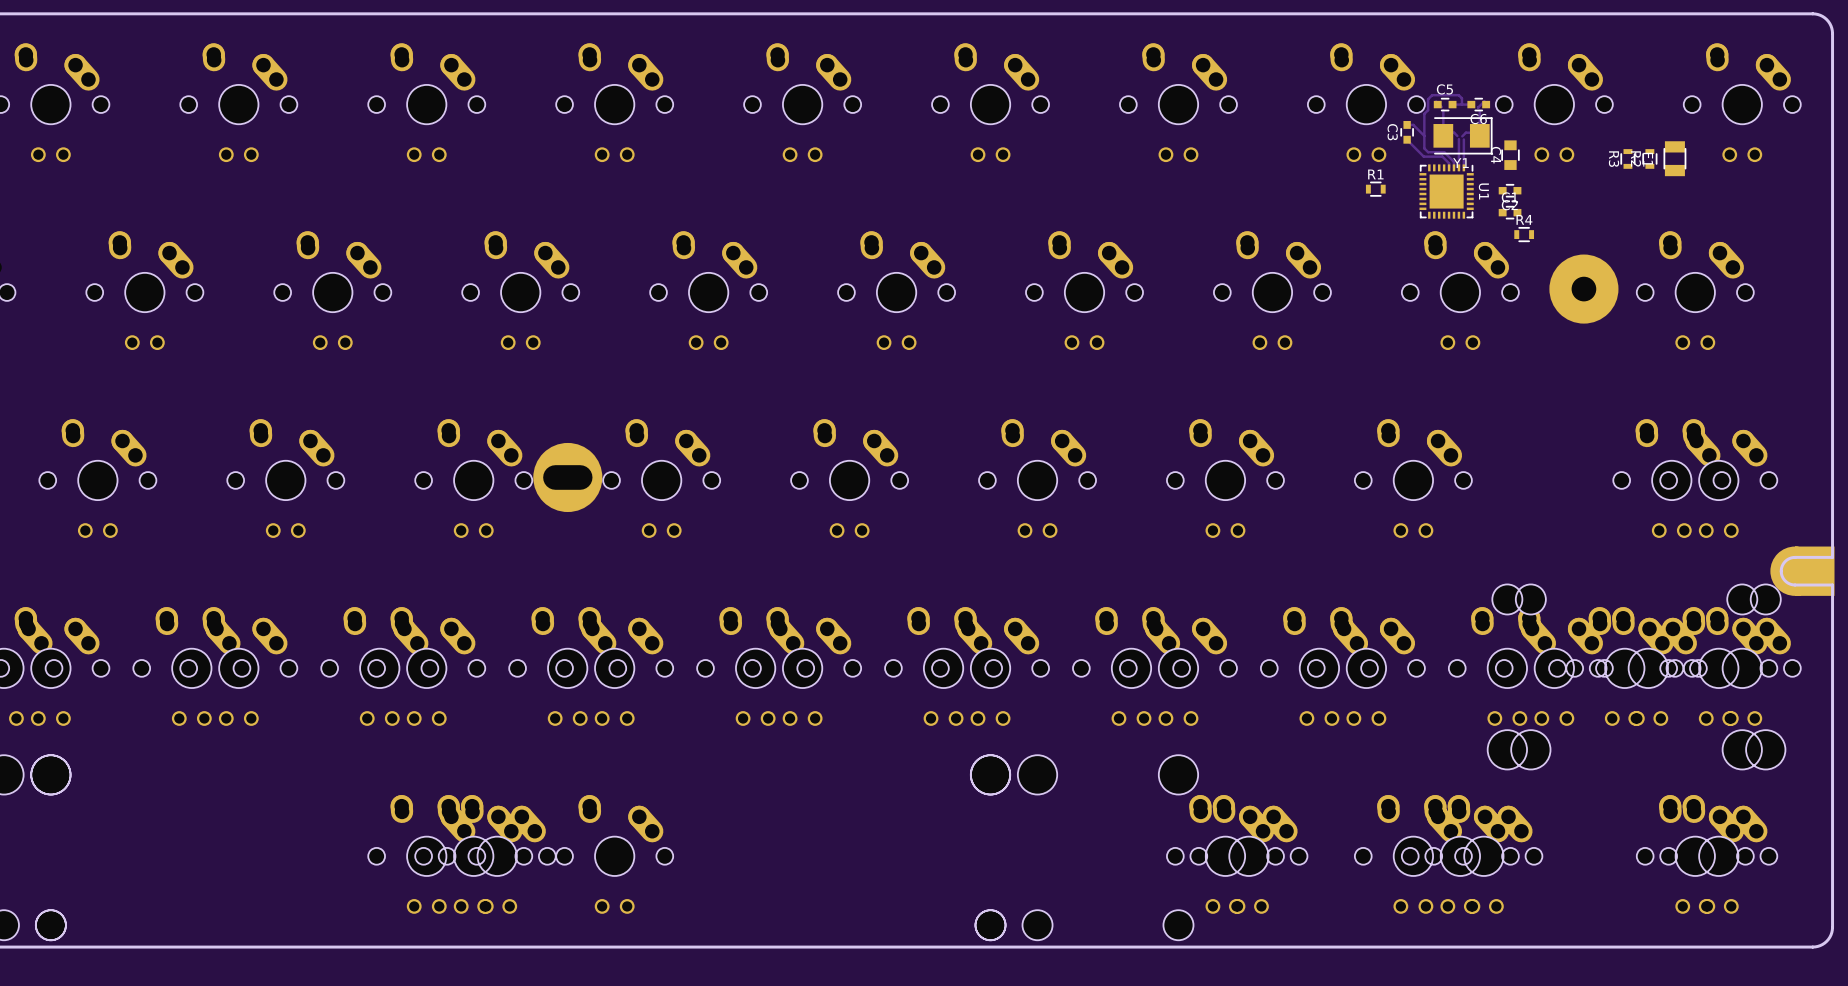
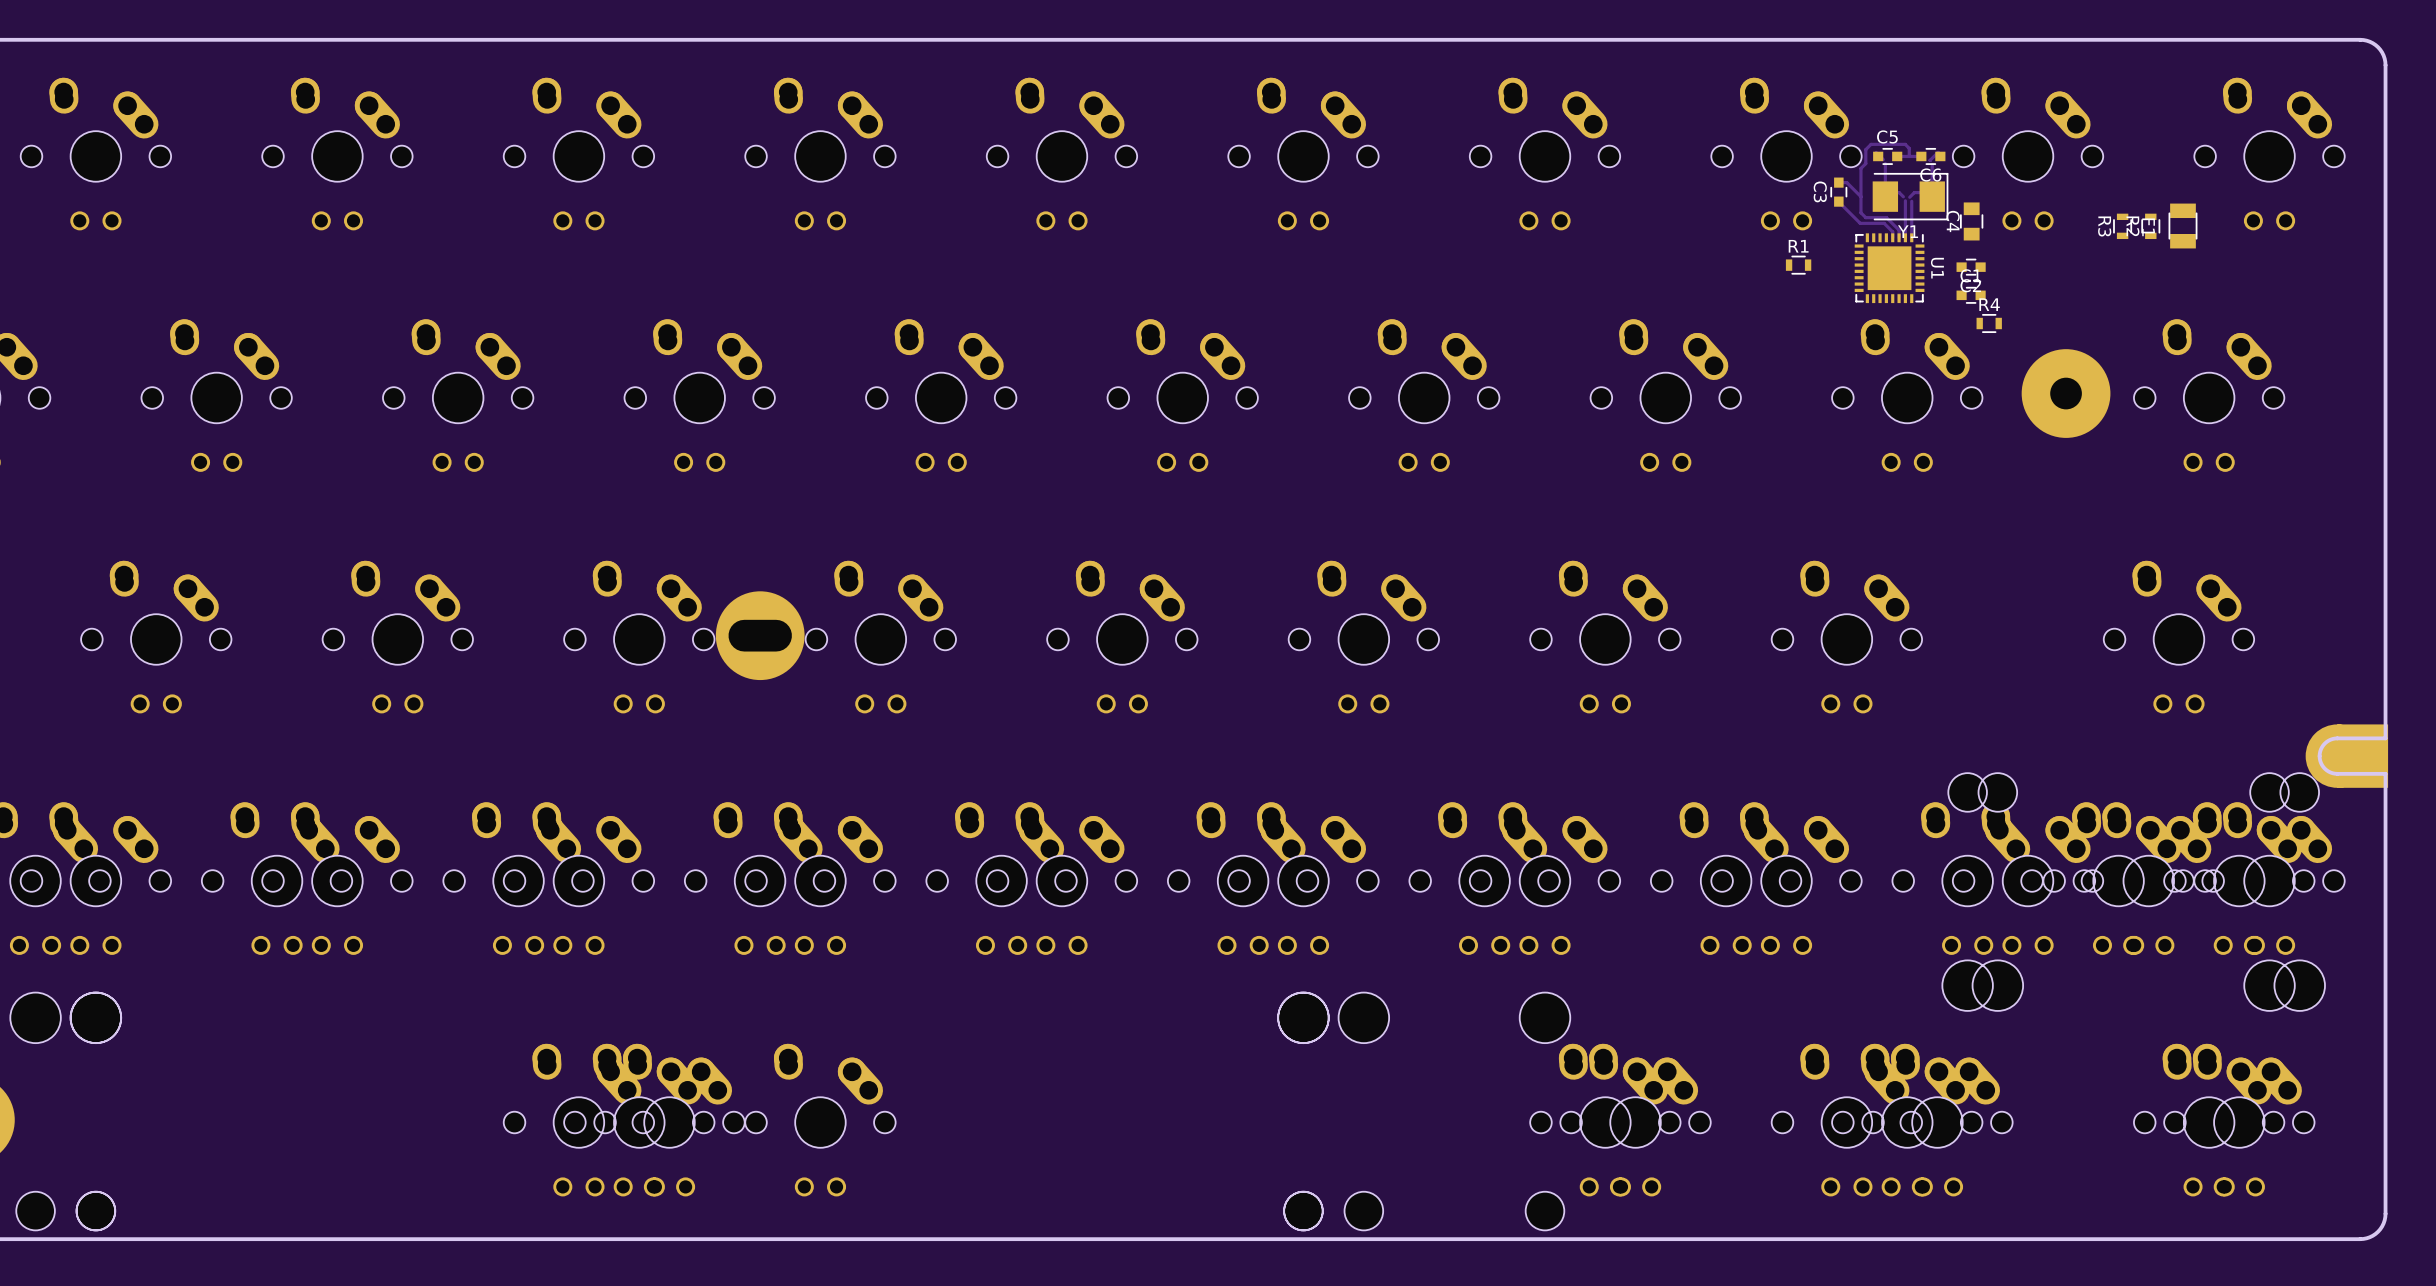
part: (1718, 478) -> none

